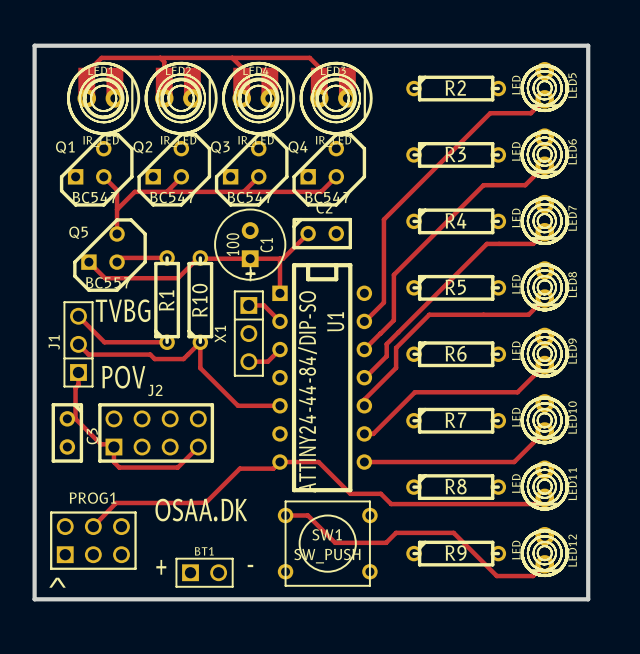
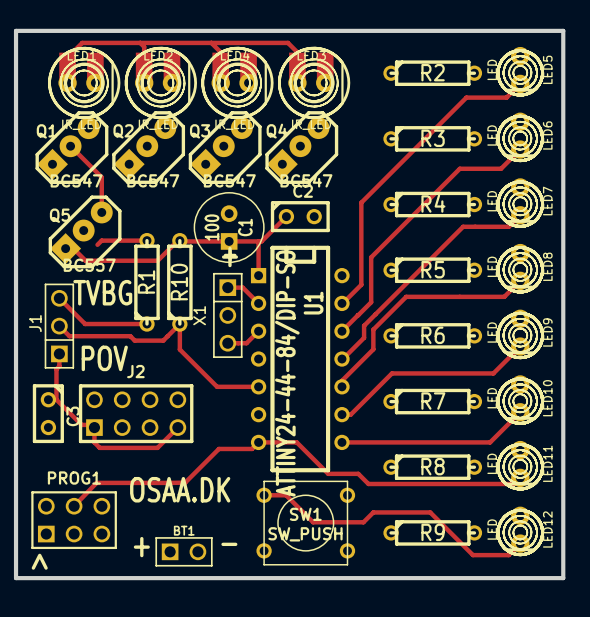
Q1 footprint: [59, 132, 134, 207] -> [35, 111, 109, 185]
Q2 footprint: [137, 132, 212, 207] -> [112, 111, 186, 184]
Q3 footprint: [214, 132, 289, 207] -> [188, 111, 262, 185]
Q4 footprint: [292, 132, 367, 207] -> [265, 111, 339, 184]
track: none -> (70, 146) (101, 177) (101, 212)
track: (103, 176) (117, 190) (117, 233) -> none
track: (181, 176) (166, 191) -> none
track: (258, 176) (243, 191) -> none
track: (336, 176) (321, 191) (134, 191) (117, 209) -> none
Q5 footprint: [73, 218, 147, 292] -> [48, 195, 122, 269]

